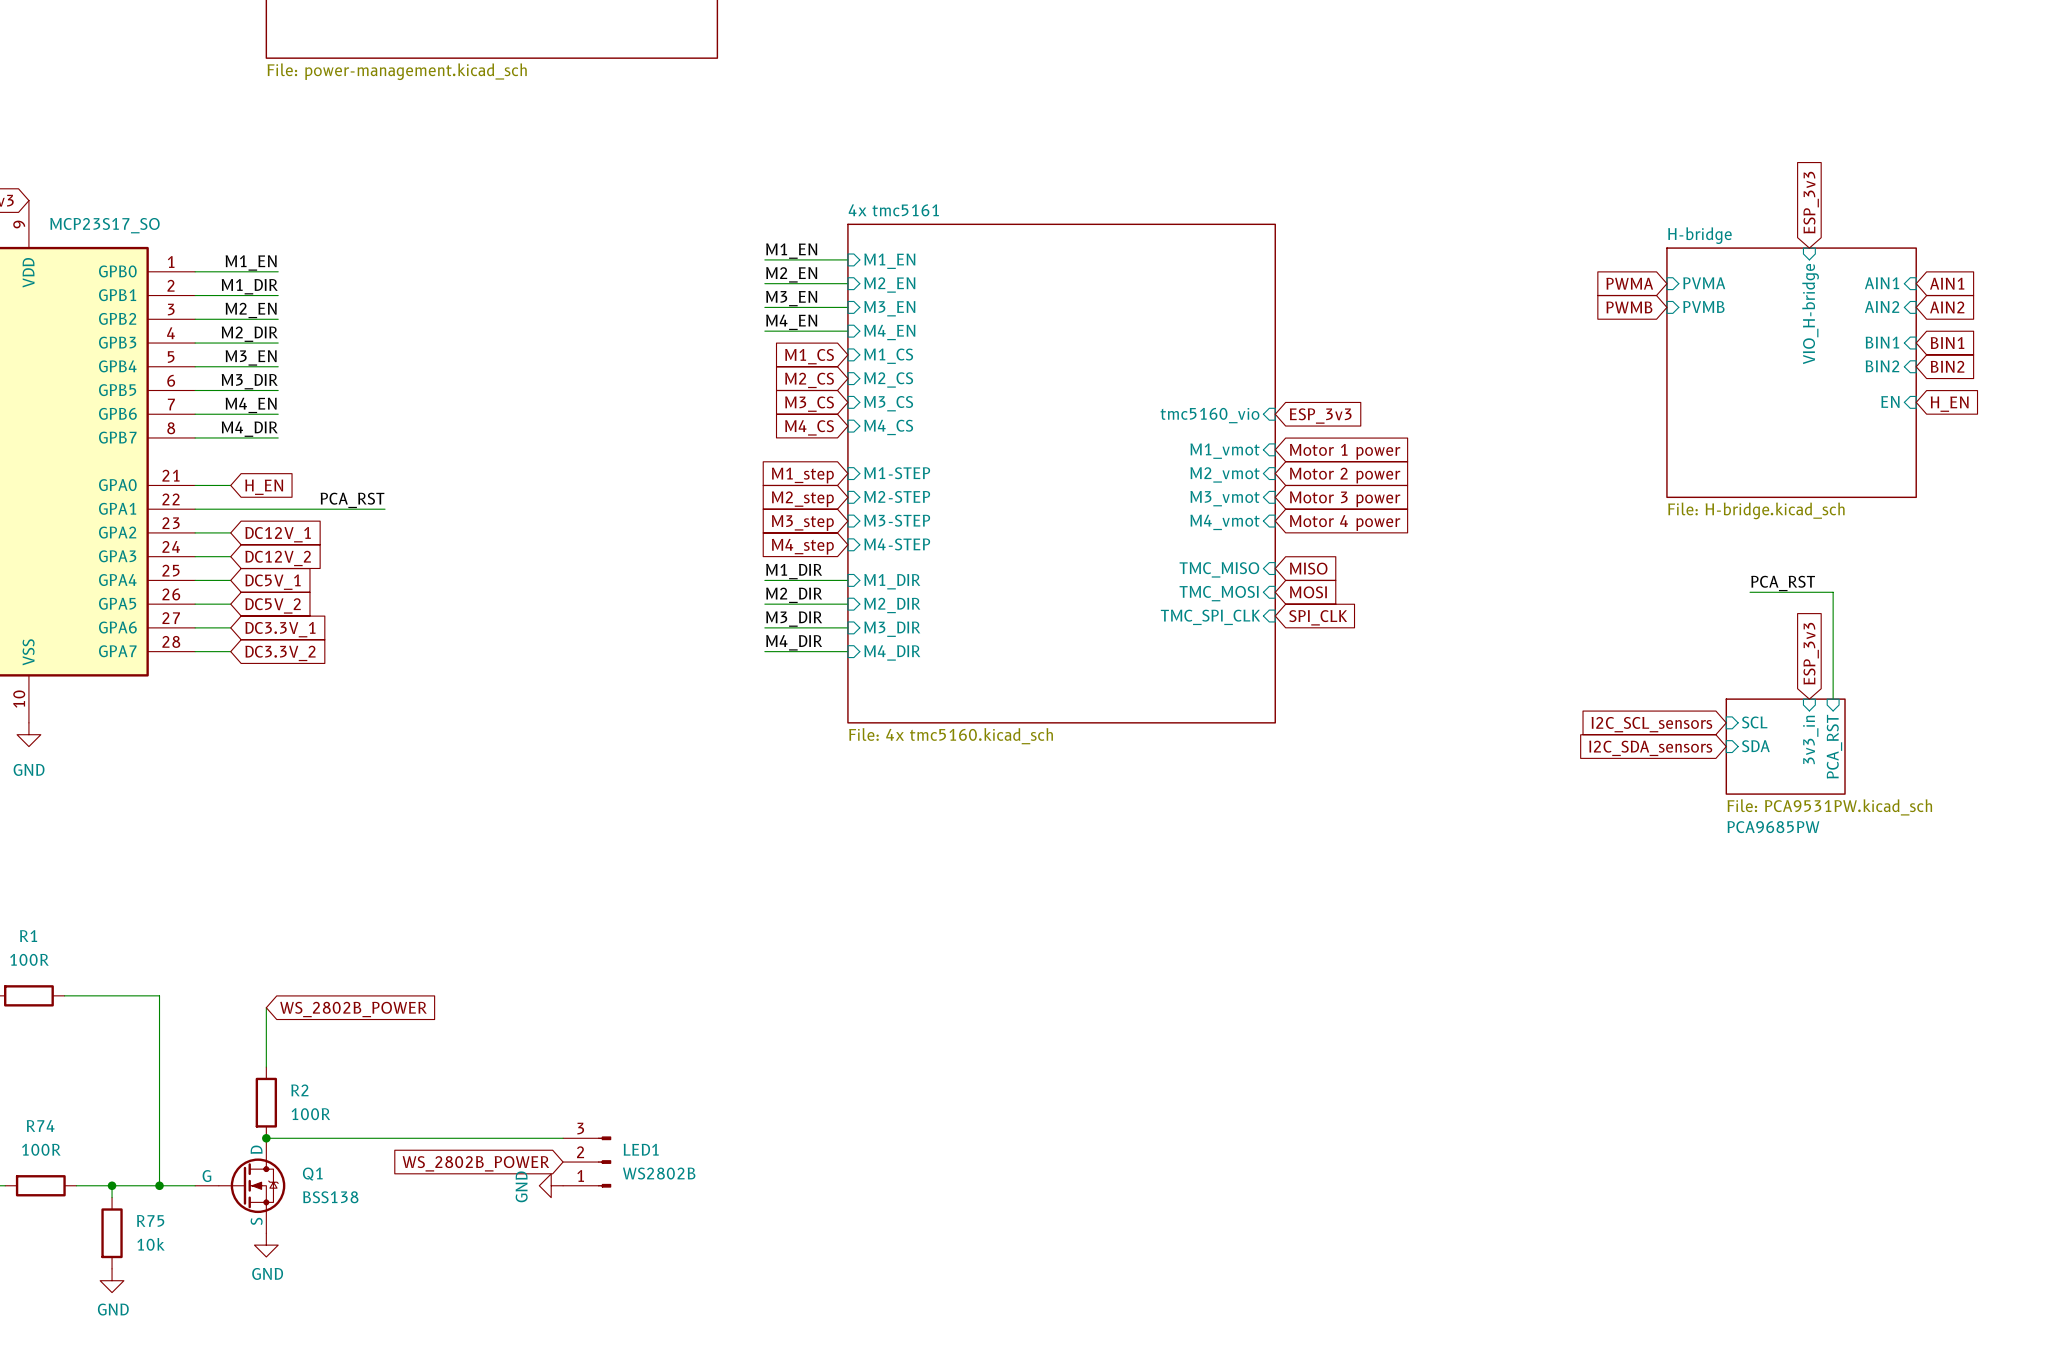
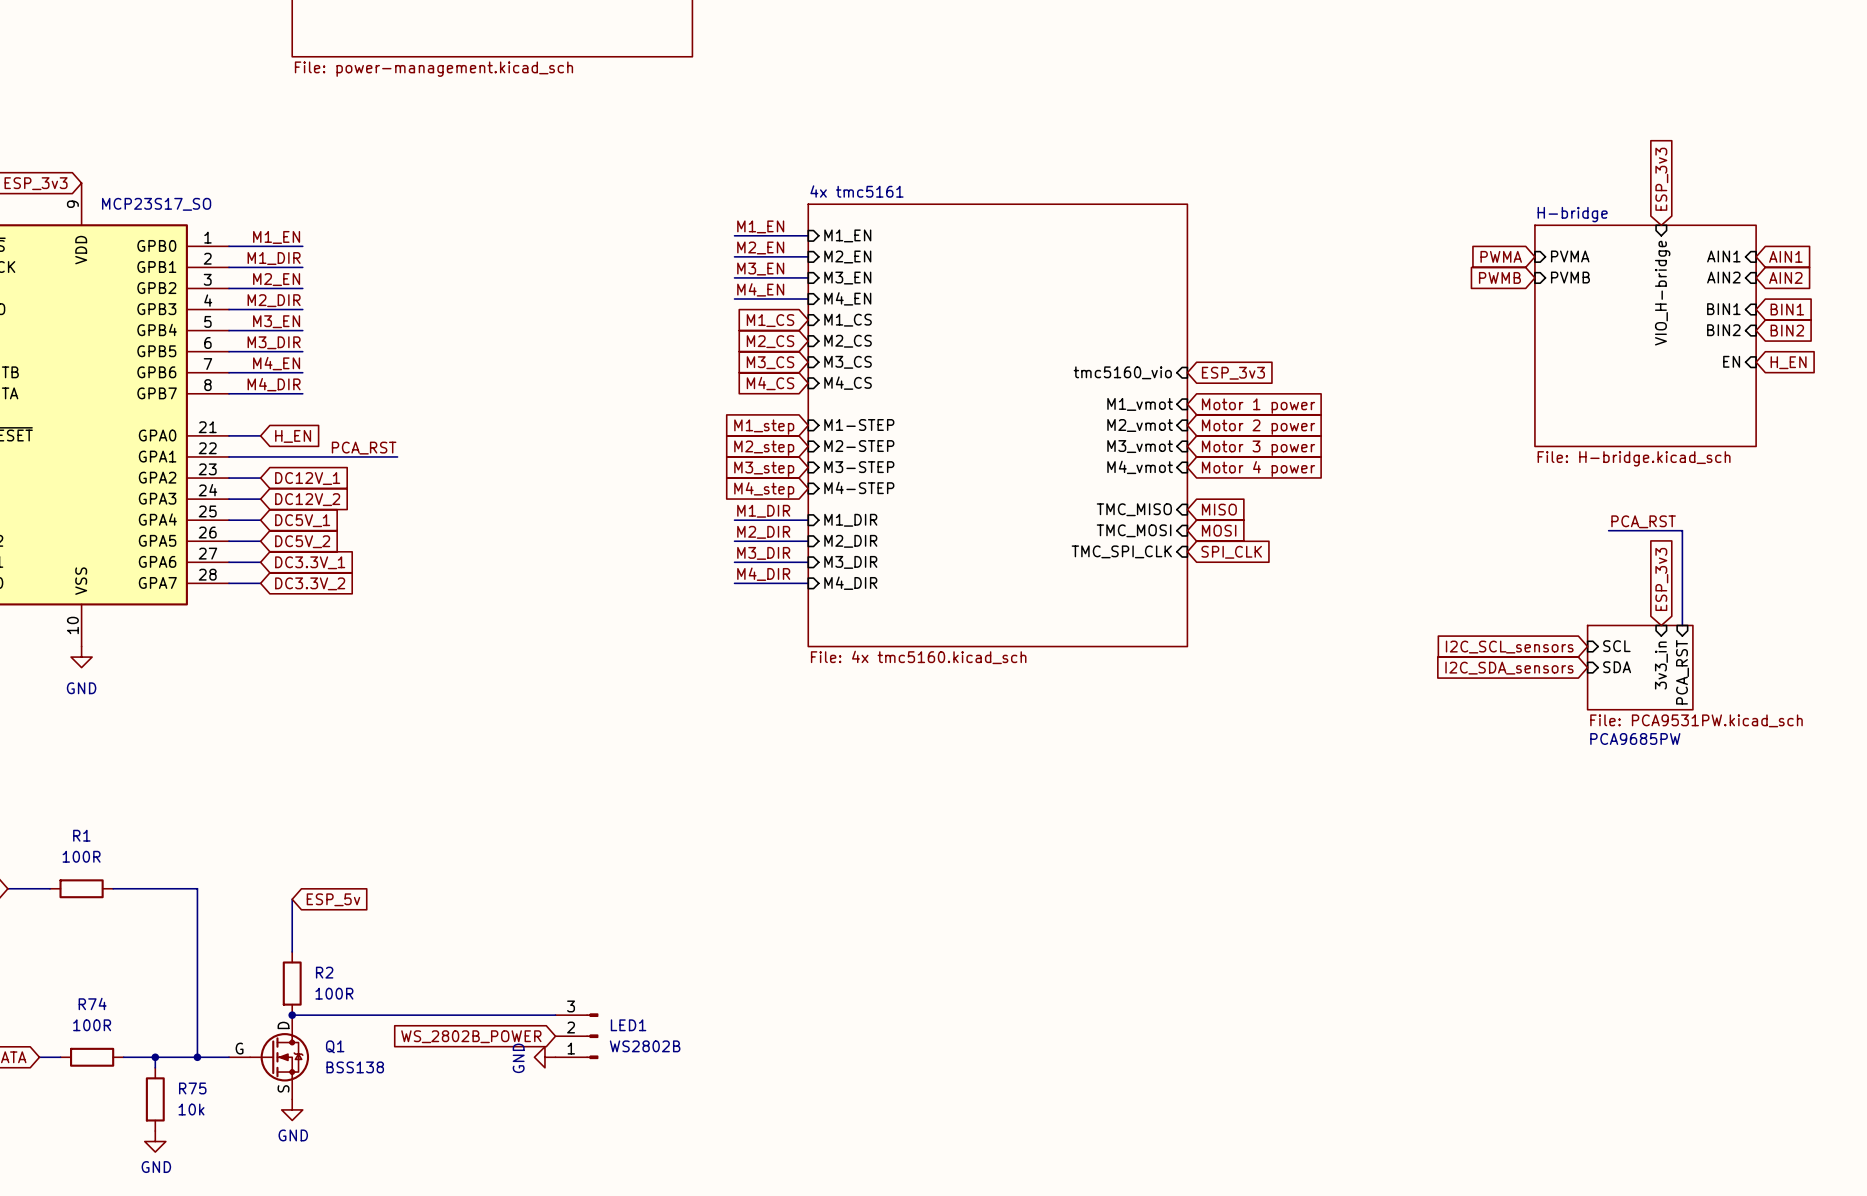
global label: WS_2802B_POWER (353, 1009) -> ESP_5v (333, 899)

